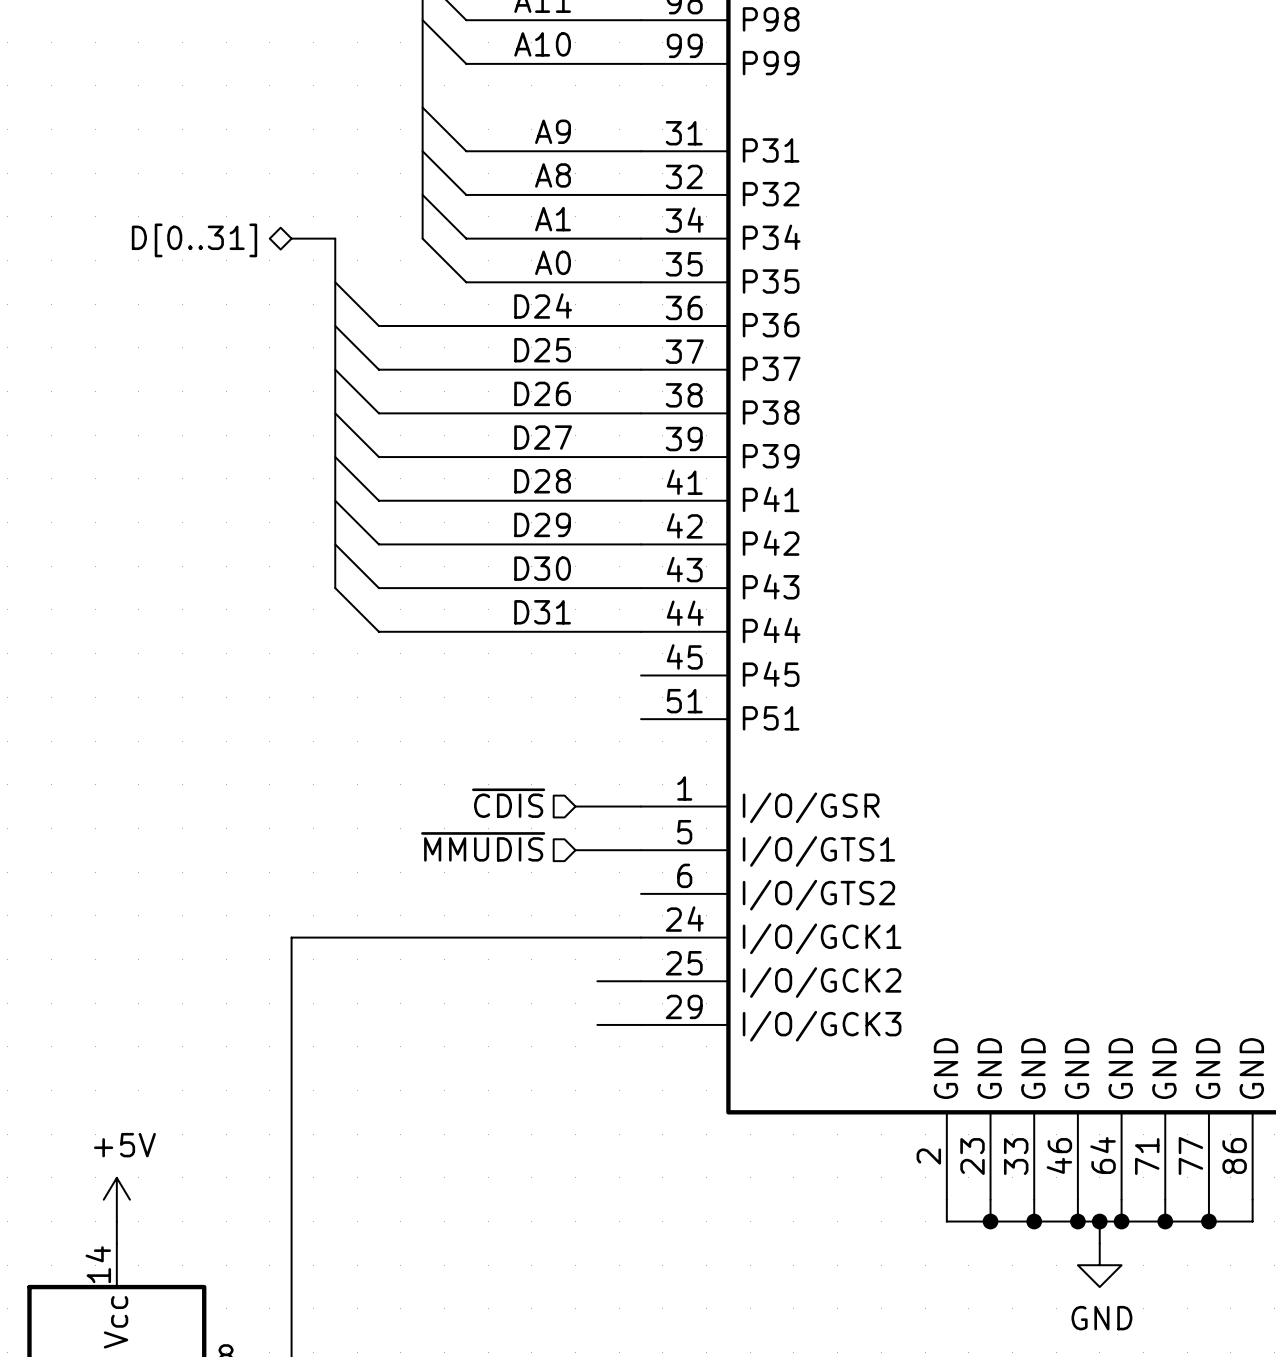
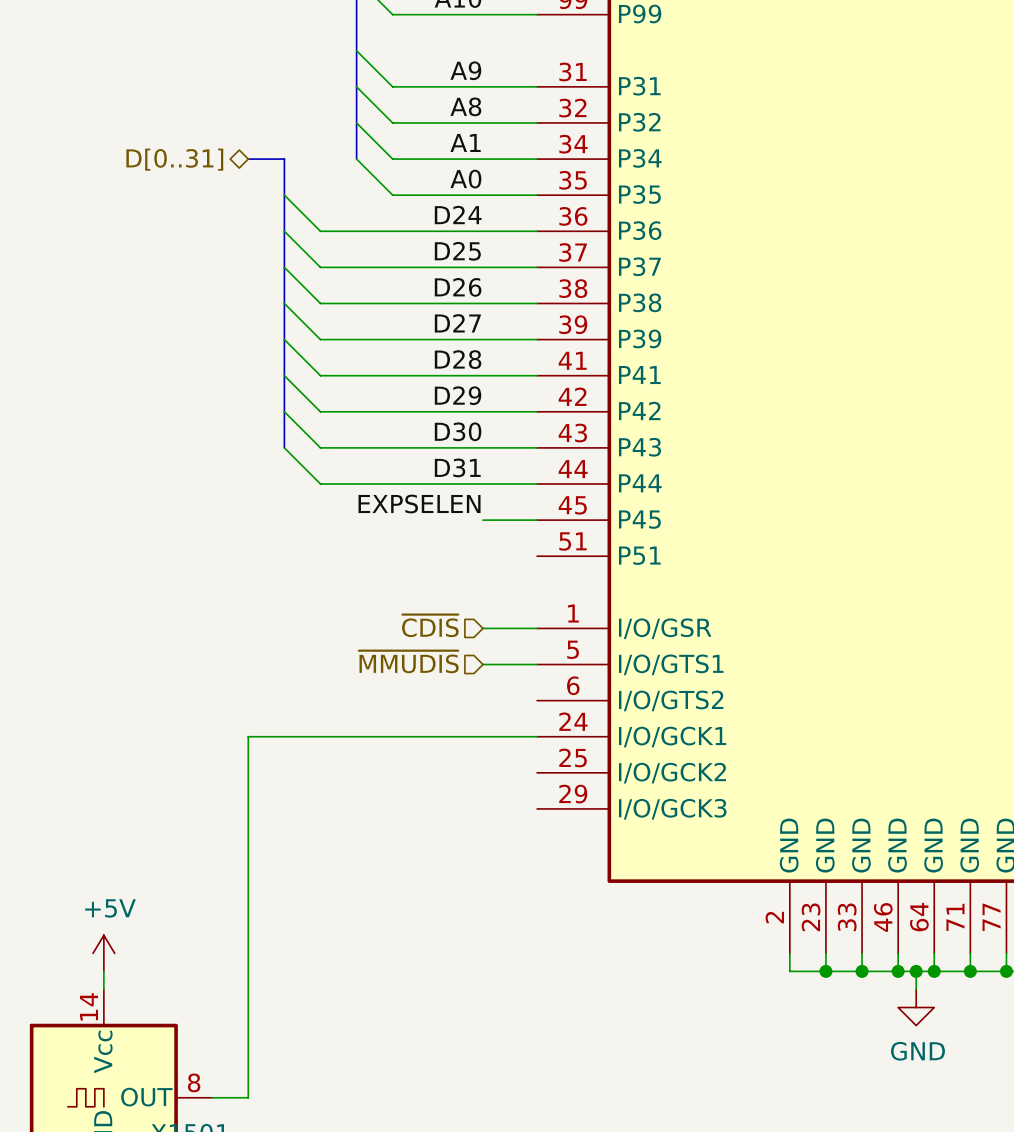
label: none -> EXPSELEN (419, 504)
wire: none -> (482, 520) (537, 520)
wire: (597, 981) (641, 981) -> none
wire: (597, 1024) (641, 1024) -> none

